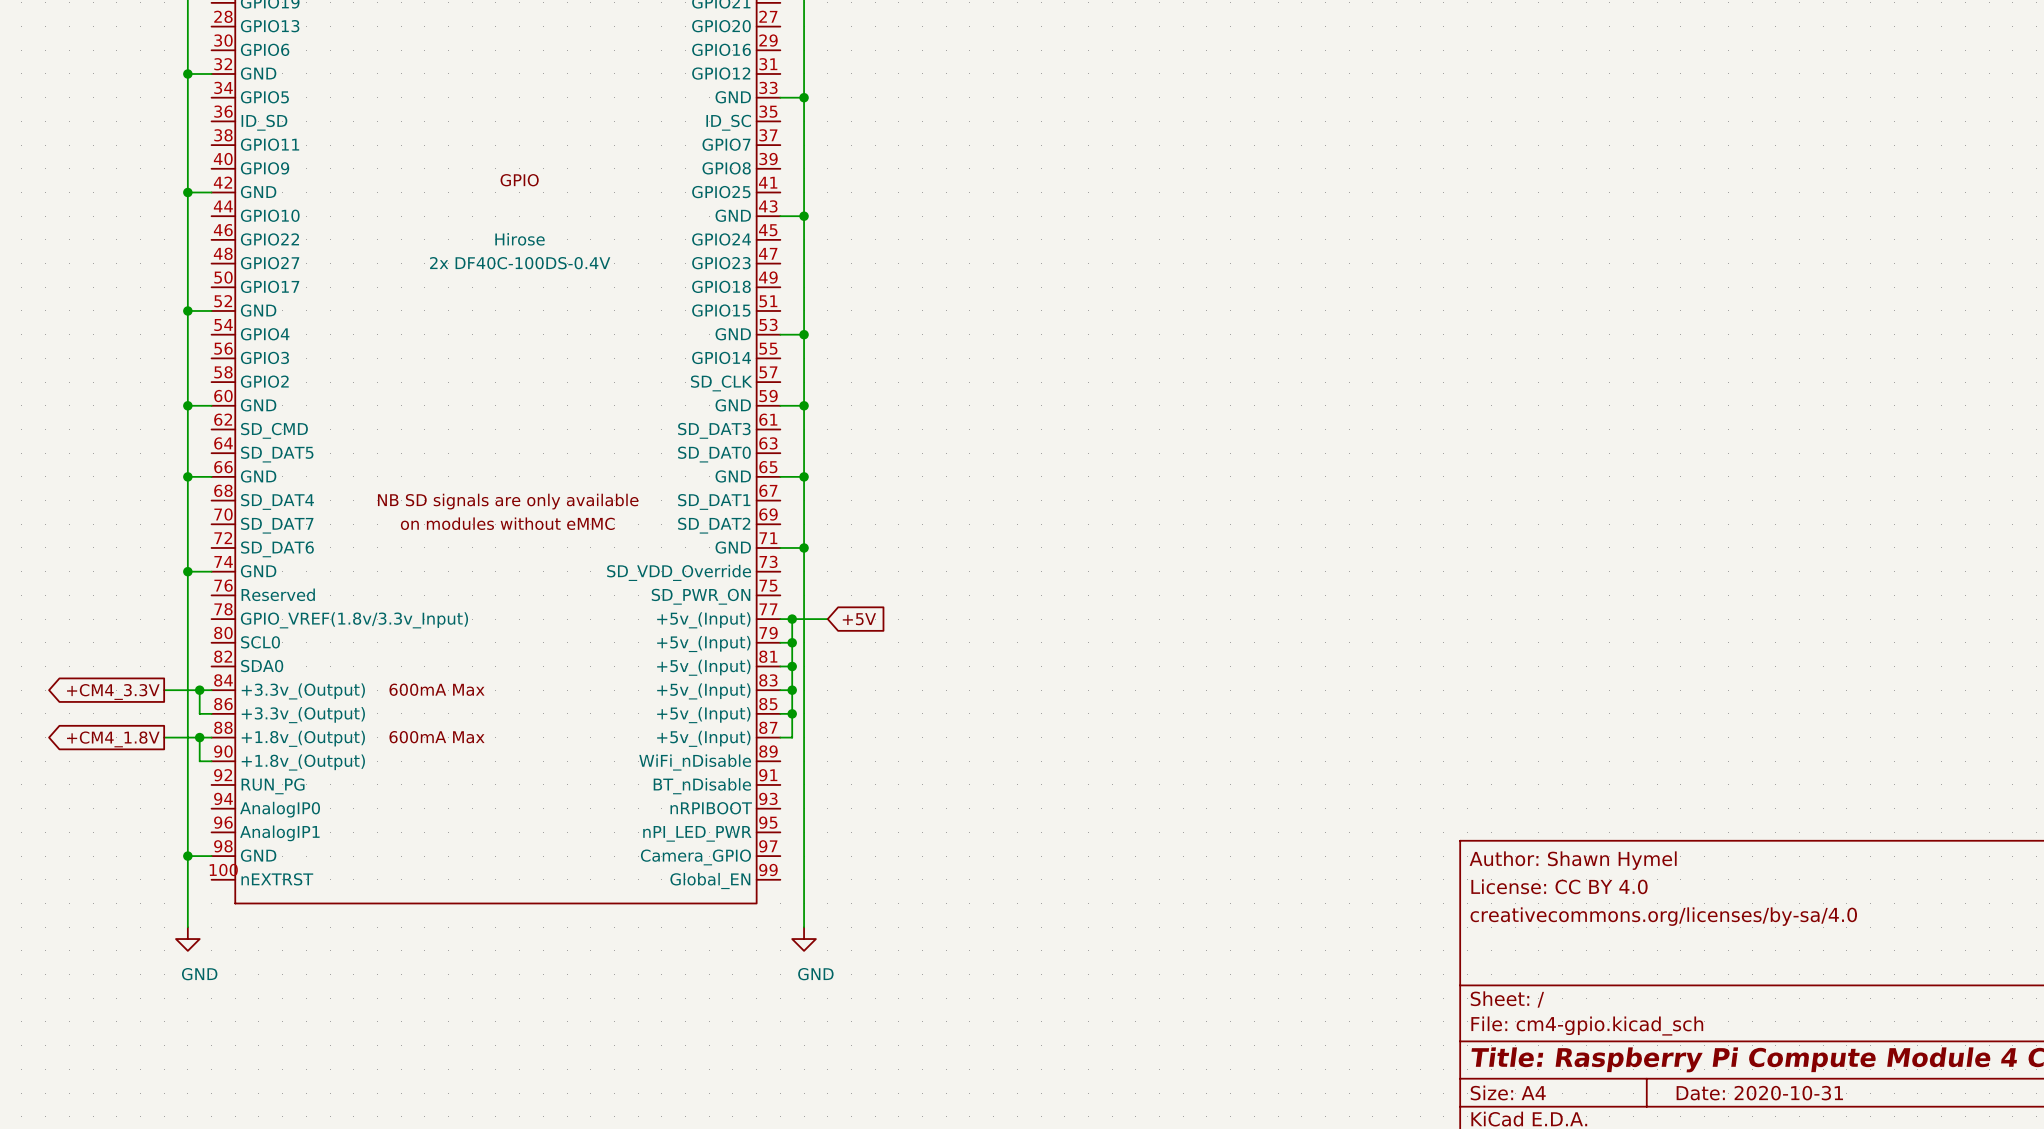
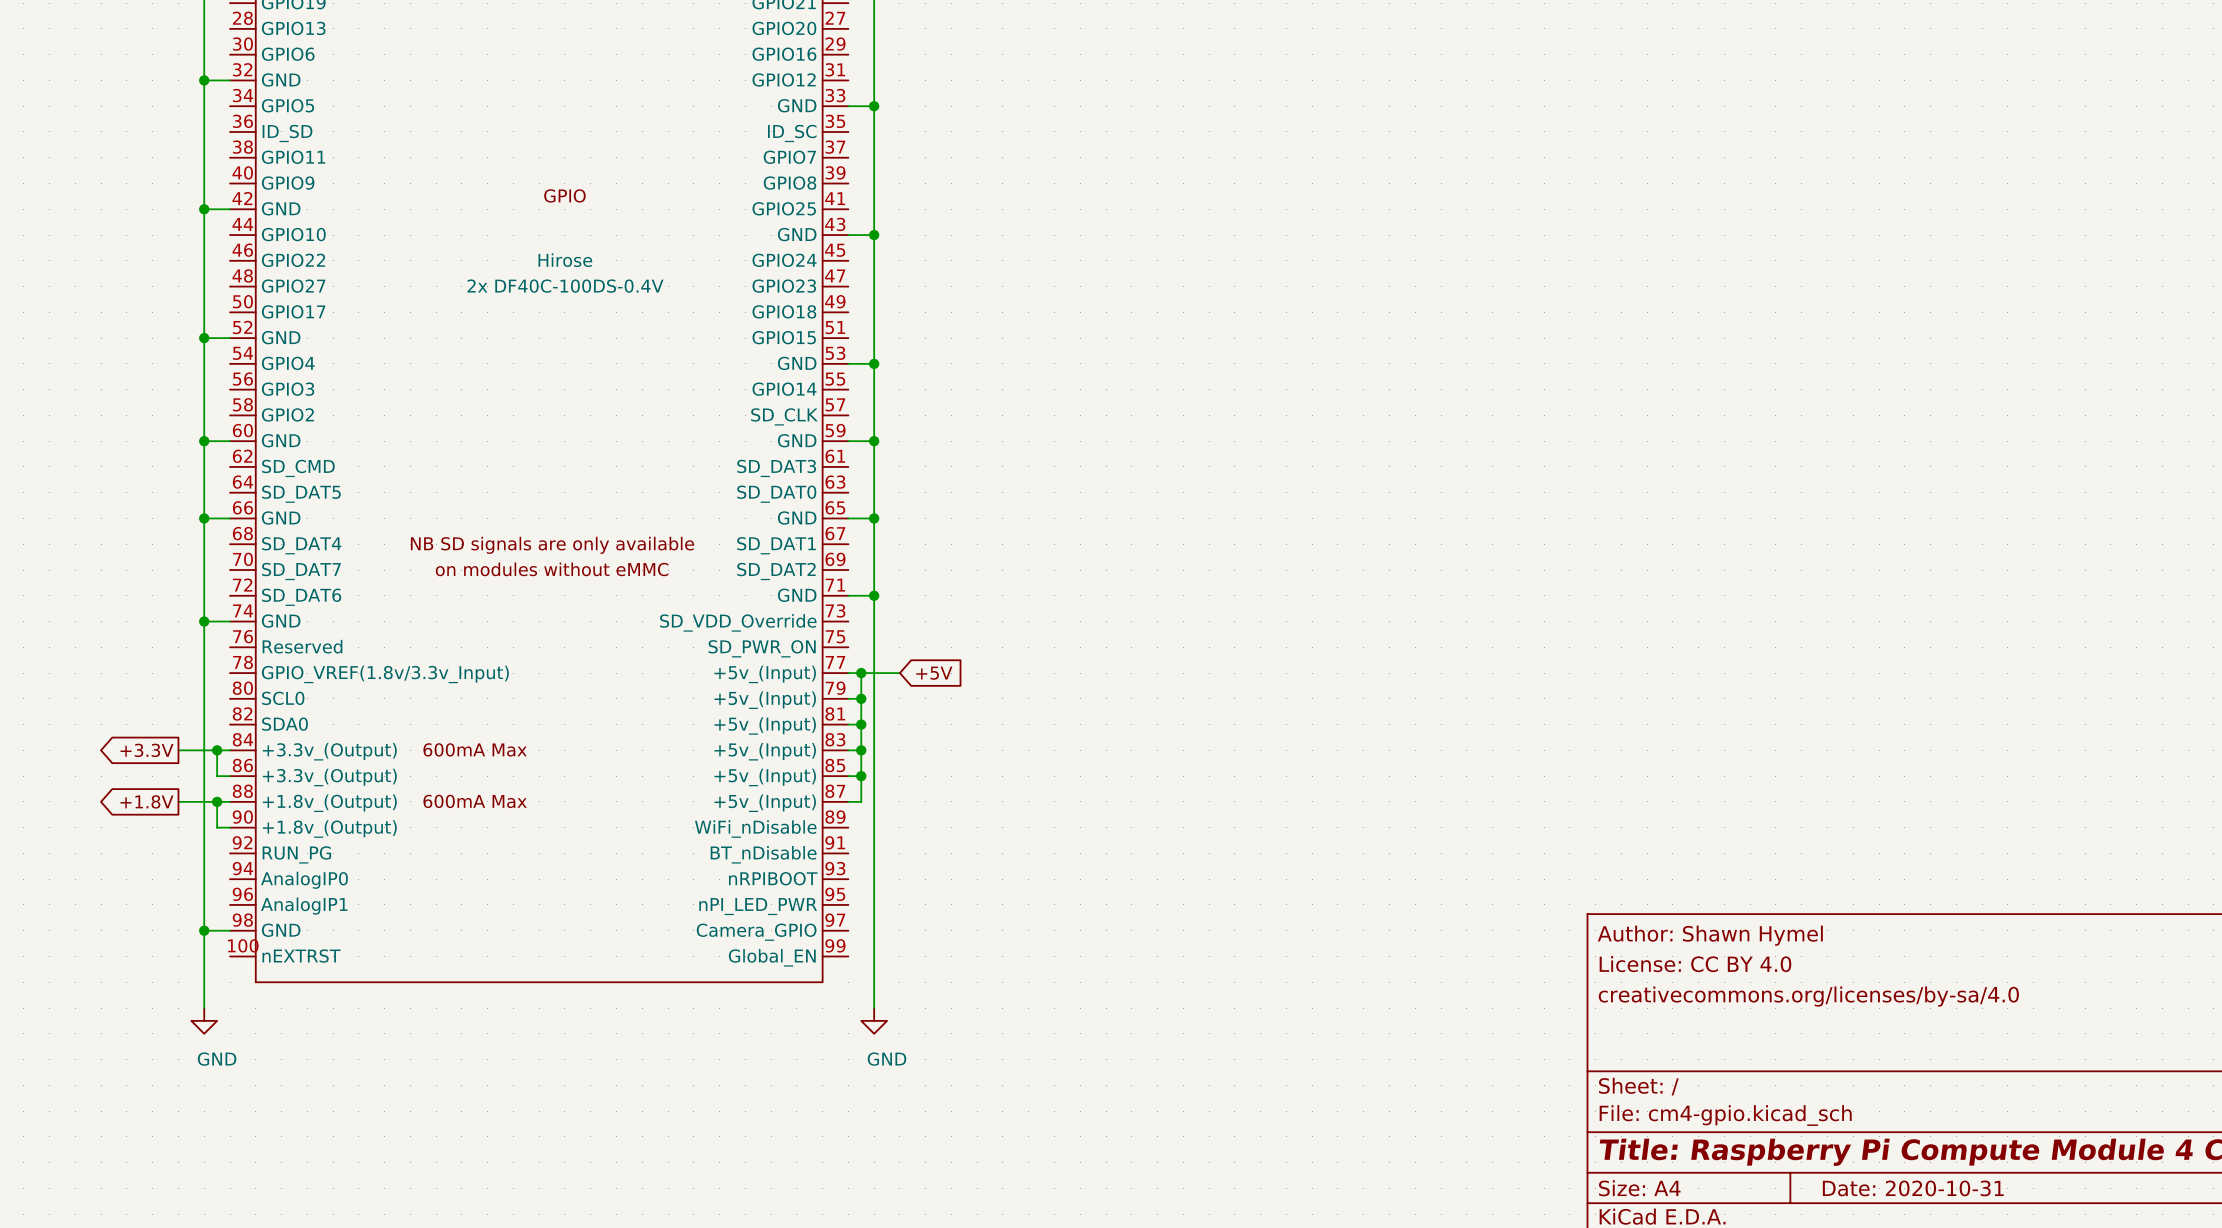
global label: +CM4_3.3V (113, 691) -> +3.3V (147, 750)
global label: +CM4_1.8V (113, 739) -> +1.8V (147, 801)

